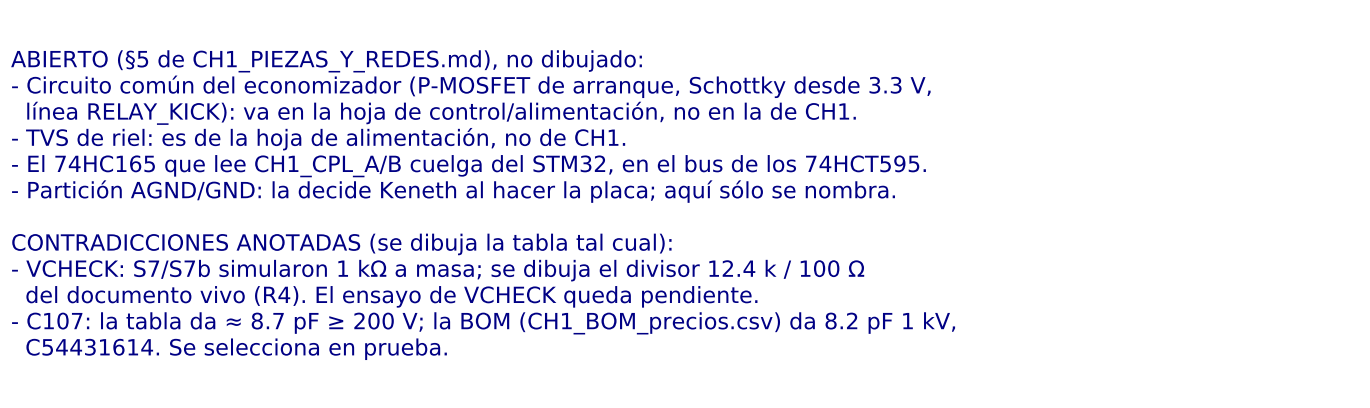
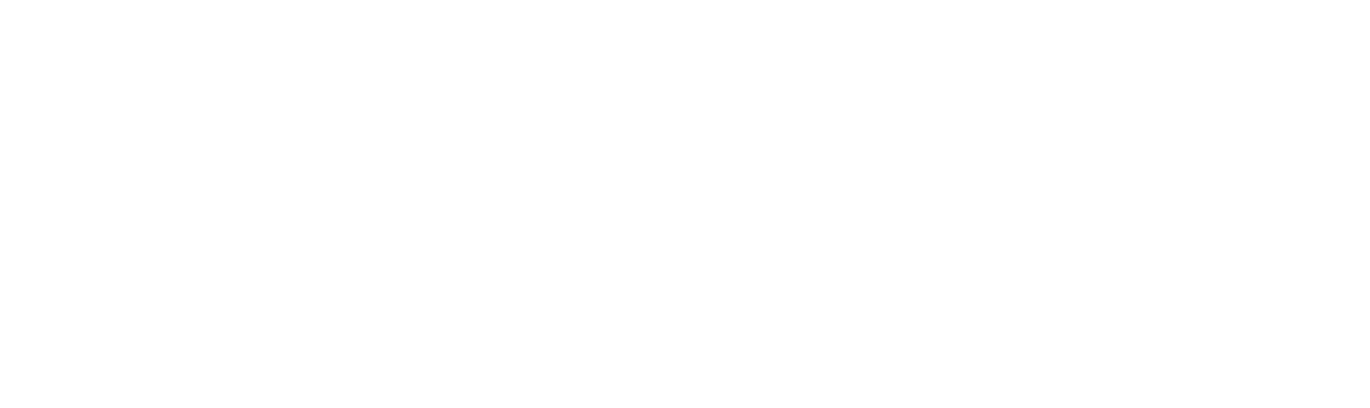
text: ABIERTO (§5 de CH1_PIEZAS_Y_REDES.md), no dibujado: (326, 61) -> none
text: - Circuito común del economizador (P-MOSFET de arranque, Schottky desde 3.3 V, (471, 86) -> none
text: línea RELAY_KICK): va en la hoja de control/alimentación, no en la de CH1. (441, 113) -> none
text: - TVS de riel: es de la hoja de alimentación, no de CH1. (318, 139) -> none
text: - El 74HC165 que lee CH1_CPL_A/B cuelga del STM32, en el bus de los 74HCT595. (468, 166) -> none
text: - Partición AGND/GND: la decide Keneth al hacer la placa; aquí sólo se nombra. (453, 191) -> none
text: CONTRADICCIONES ANOTADAS (se dibuja la tabla tal cual): (341, 244) -> none
text: - VCHECK: S7/S7b simularon 1 kΩ a masa; se dibuja el divisor 12.4 k / 100 Ω (438, 270) -> none
text: del documento vivo (R4). El ensayo de VCHECK queda pendiente. (391, 296) -> none
text: - C107: la tabla da ≈ 8.7 pF ≥ 200 V; la BOM (CH1_BOM_precios.csv) da 8.2 pF 1 kV, (483, 323) -> none
text: C54431614. Se selecciona en prueba. (236, 349) -> none

